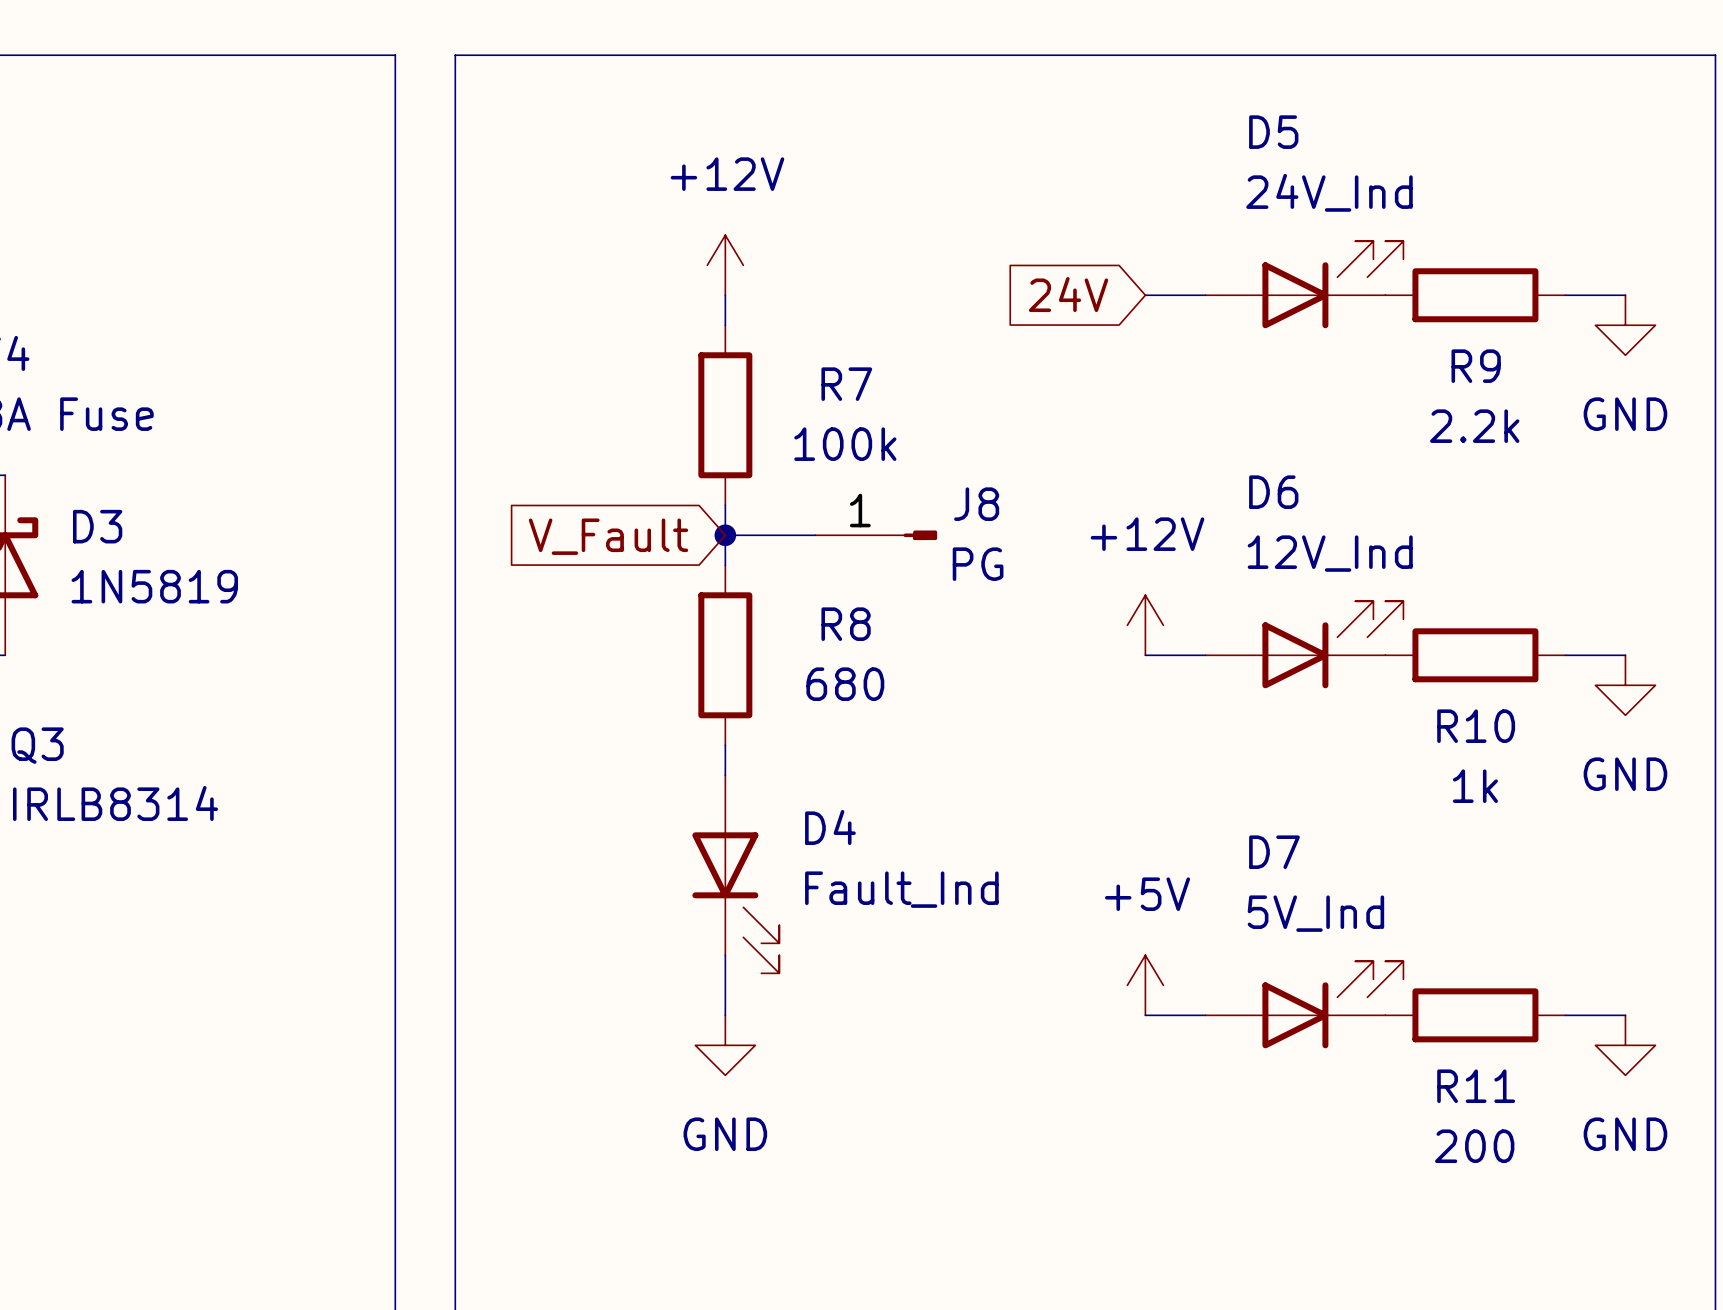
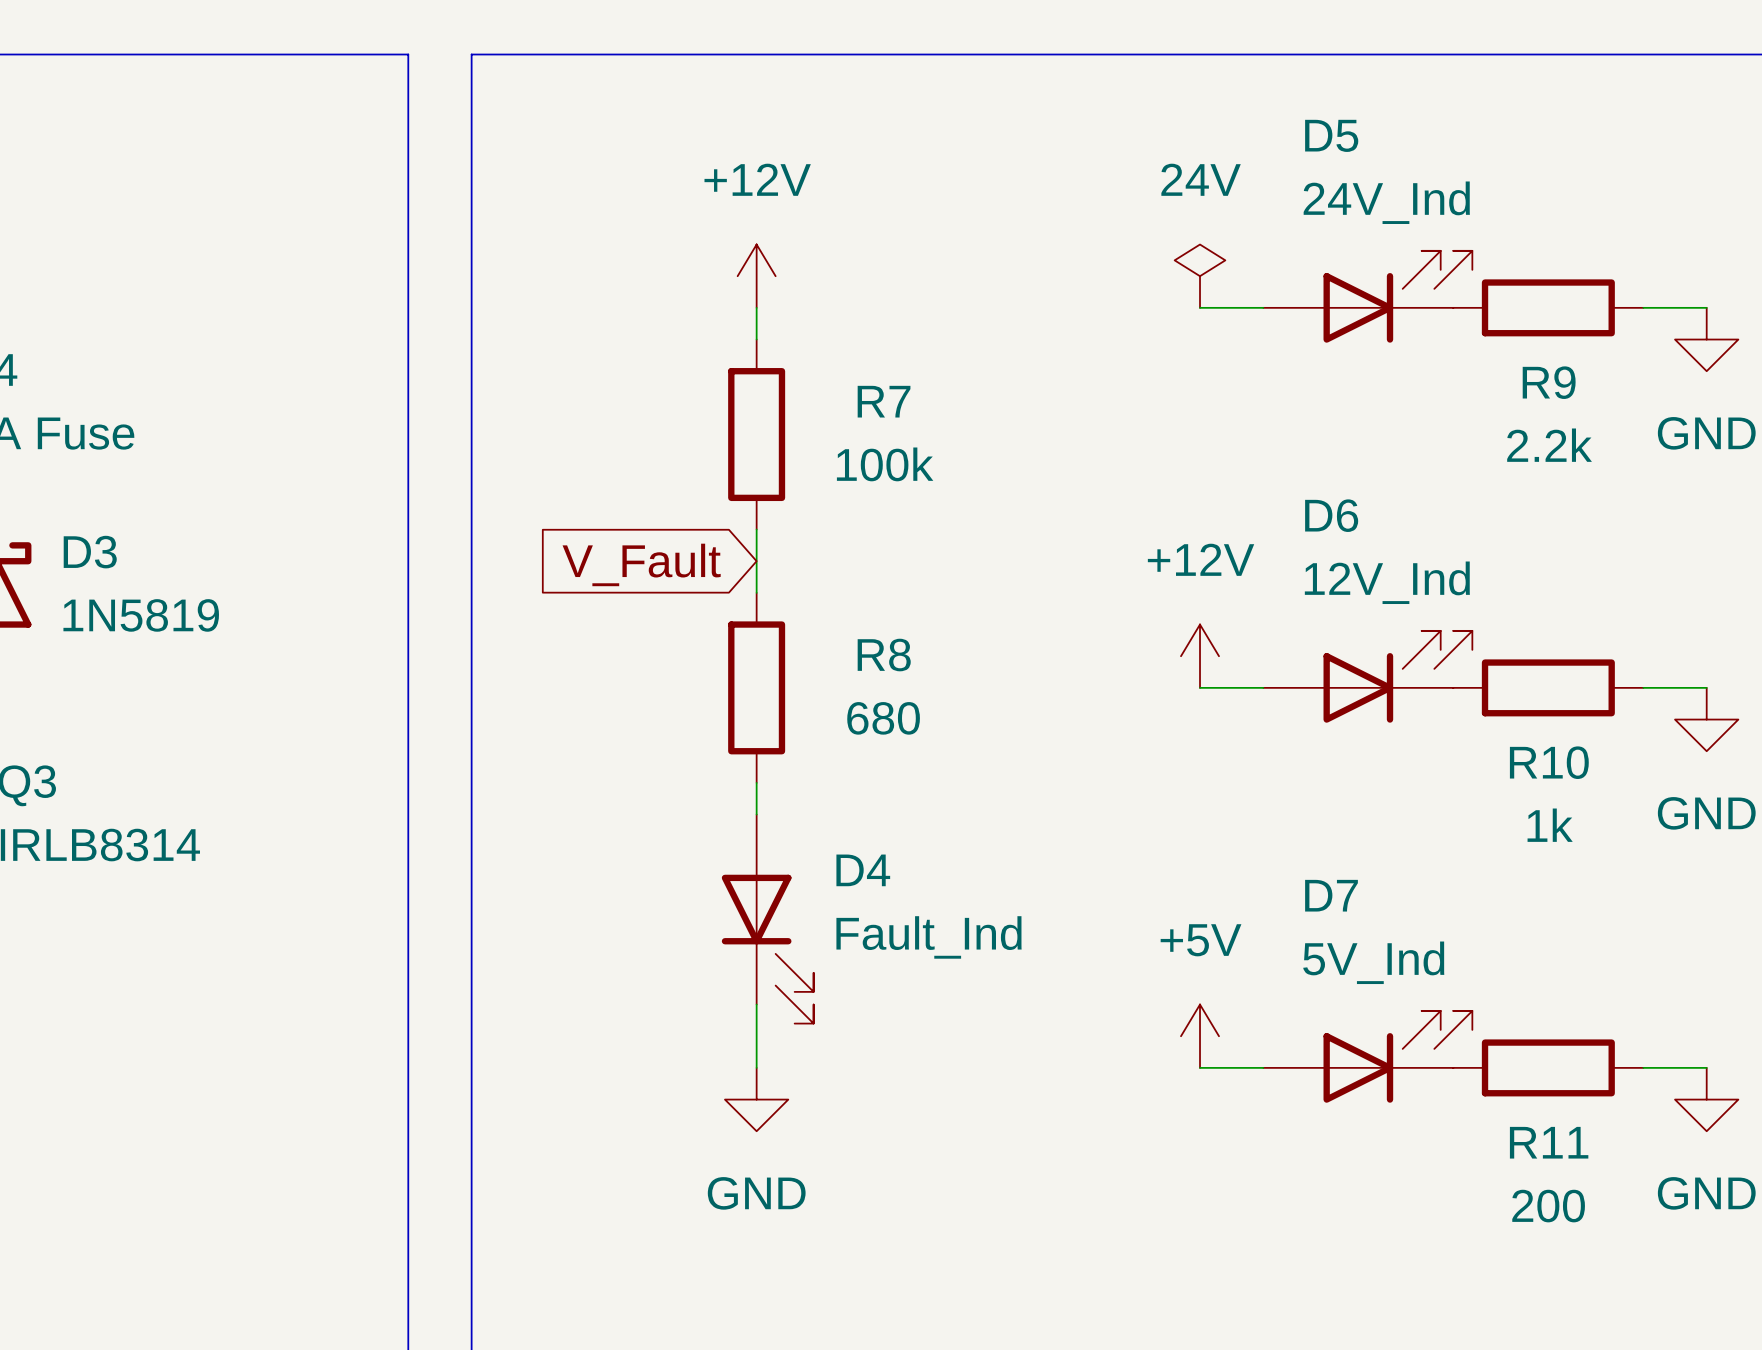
power symbol: none -> 24V (1200, 276)
global label: 24V (1068, 294) -> none
wire: (725, 535) (815, 535) -> none
junction: (725, 535) -> none
J8: PG (876, 535) -> none

